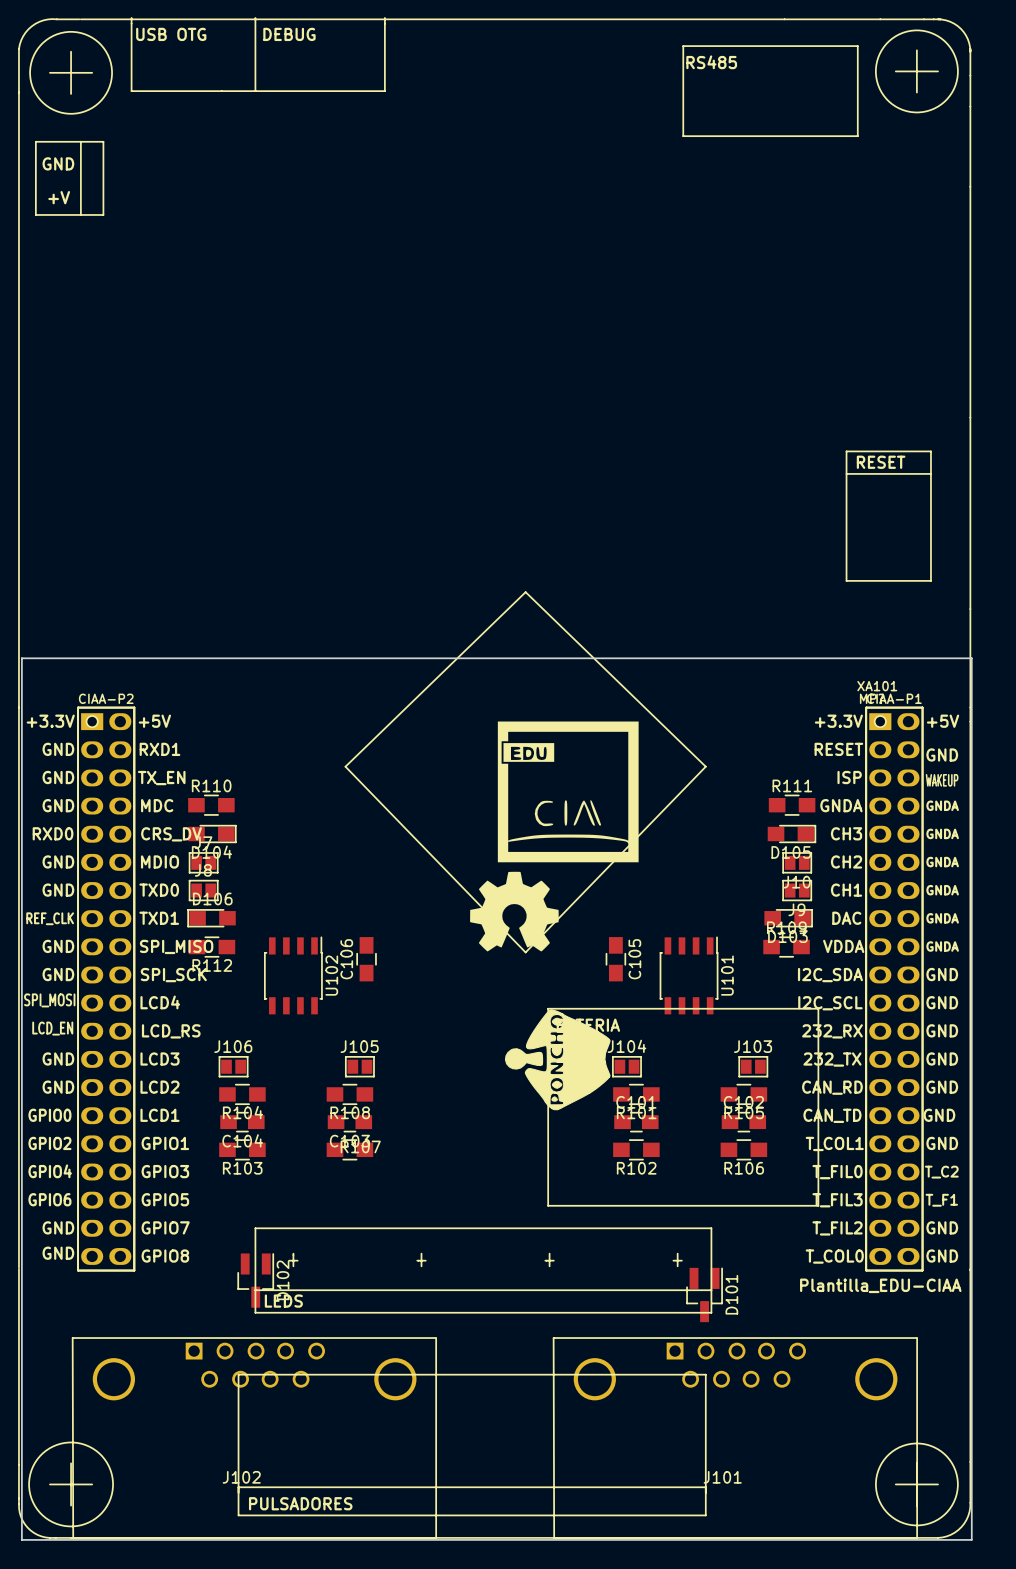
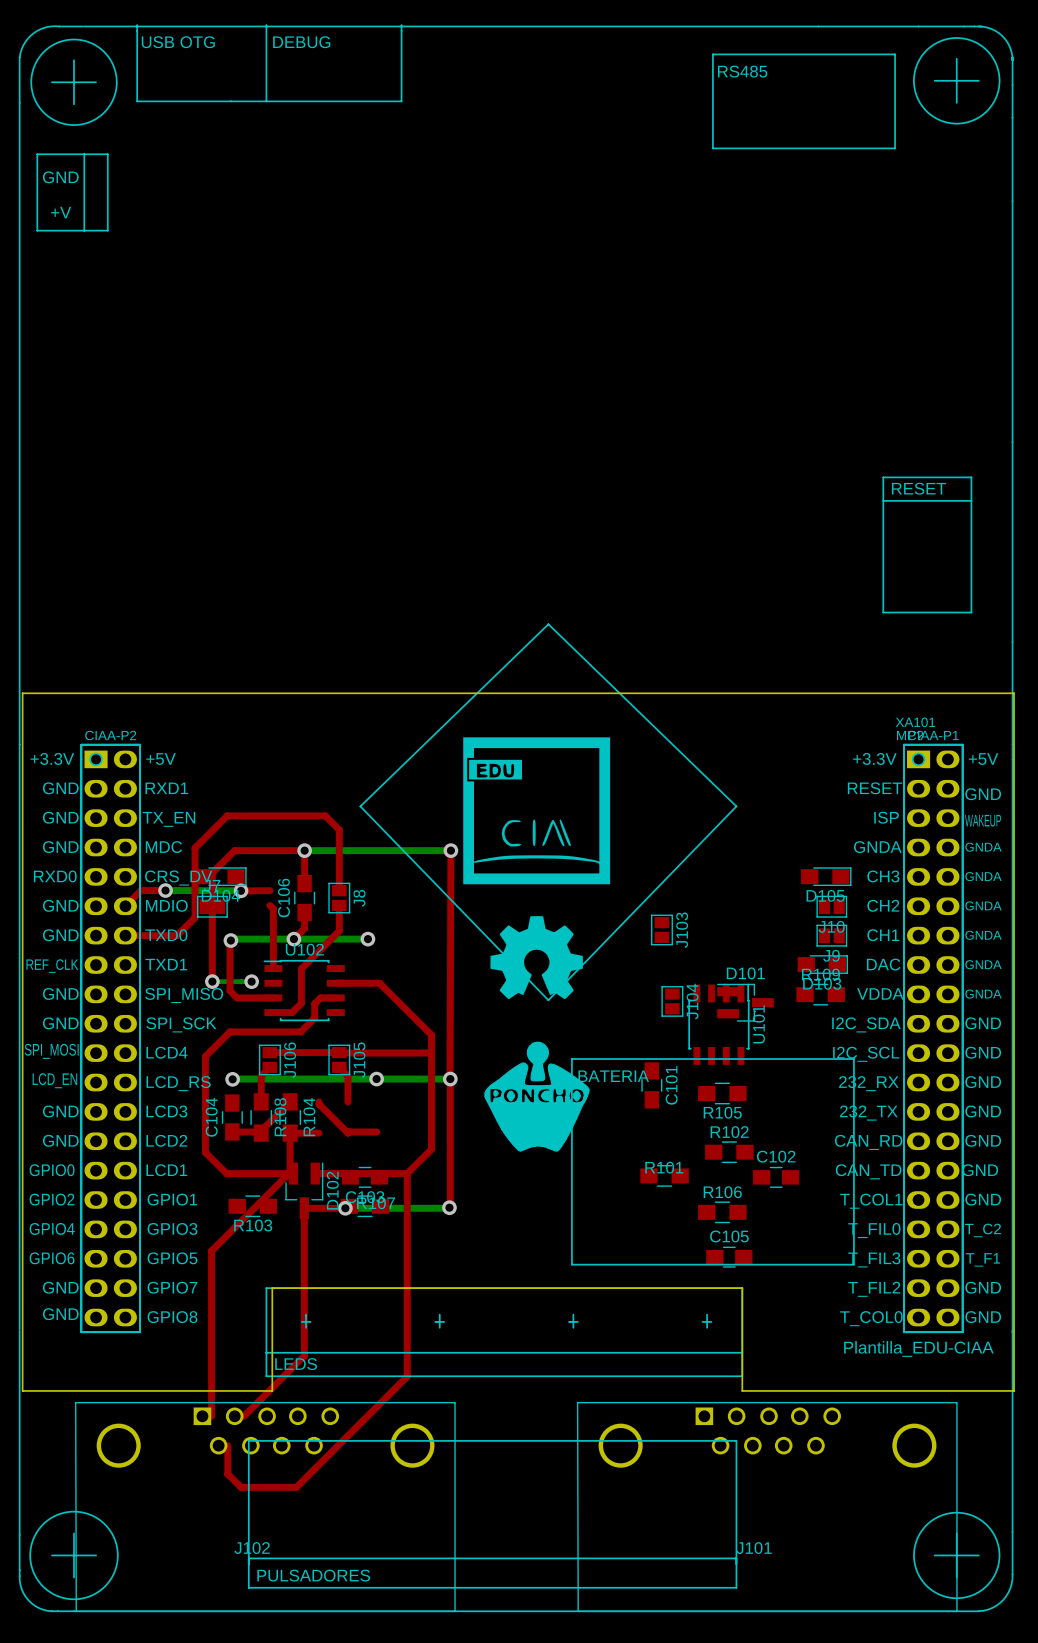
board edge: (21, 658) (21, 1539) (971, 1539) -> (22, 693) (22, 1390) (272, 1390) (272, 1288) (742, 1288) (742, 1390) (1014, 1390)
drawing position: (568, 791) -> (536, 810)
R110: (211, 805) -> none
R111: (792, 805) -> none
bottom track: none -> (304, 850) (450, 850)
via: none -> (304, 850)
top track: none -> (450, 850) (449, 1207)
via: none -> (450, 850)
top track: none -> (304, 883) (304, 850) (234, 850) (212, 872) (212, 981)
bottom track: none -> (165, 890) (241, 890)
top track: none -> (165, 890) (141, 890) (125, 906)
via: none -> (165, 890)
via: none -> (241, 890)
top track: none -> (269, 890) (241, 890)
top track: none -> (339, 890) (339, 829) (325, 815) (227, 815) (195, 848) (195, 917) (177, 935) (125, 935)
top track: none -> (269, 905) (273, 908) (273, 968)
top track: none -> (339, 905) (339, 931) (301, 968) (301, 1003) (292, 1012) (273, 1012)
top track: none -> (304, 912) (304, 928) (293, 939)
J8 rotation: 0° (203, 890) -> 90° clockwise (339, 898)
J8 position: (203, 890) -> (339, 898)
via: none -> (293, 939)
bottom track: none -> (367, 939) (230, 940)
via: none -> (367, 939)
top track: none -> (230, 940) (230, 990) (237, 997) (273, 997)
via: none -> (230, 940)
D106: (211, 918) -> none
via: none -> (212, 981)
via: none -> (251, 981)
top track: none -> (335, 983) (379, 983) (431, 1035) (431, 1149) (407, 1173)
R112: (211, 947) -> none
top track: none -> (335, 997) (320, 997) (314, 1003) (314, 1018) (300, 1031) (230, 1031) (205, 1056) (205, 1152) (226, 1173) (293, 1173) (290, 1170) (290, 1133) (319, 1133)
C106 position: (366, 959) -> (304, 898)
C105 rotation: 0° (615, 959) -> 90° clockwise (729, 1257)
C105 position: (615, 959) -> (729, 1257)
C105 name position: C105 (634, 959) -> C105 (729, 1236)
U102 rotation: 0° (293, 975) -> 90° counterclockwise (304, 990)
drawing: none -> [484, 1041, 590, 1152]
top track: none -> (269, 1052) (431, 1053)
drawing: [504, 1009, 611, 1111] -> none
top track: none -> (269, 1067) (261, 1076) (261, 1101)
top track: none -> (339, 1067) (347, 1076) (347, 1101)
via: none -> (376, 1079)
bottom track: none -> (450, 1079) (232, 1079)
via: none -> (450, 1079)
via: none -> (232, 1079)
top track: none -> (290, 1101) (261, 1130) (261, 1133) (232, 1131)
top track: none -> (319, 1101) (319, 1104) (347, 1133) (376, 1131)
J106 rotation: 0° (233, 1066) -> 90° clockwise (269, 1059)
J106 position: (233, 1066) -> (269, 1059)
J105 rotation: 0° (359, 1066) -> 90° clockwise (339, 1059)
J105 position: (359, 1066) -> (339, 1059)
J104 rotation: 0° (626, 1066) -> 90° clockwise (672, 1001)
J104 position: (626, 1066) -> (672, 1001)
J103 rotation: 0° (753, 1066) -> 90° clockwise (661, 929)
J103 position: (753, 1066) -> (661, 929)
R104 rotation: 0° (242, 1094) -> 90° clockwise (290, 1117)
R104 position: (242, 1094) -> (290, 1117)
R108 rotation: 0° (349, 1094) -> 90° clockwise (261, 1117)
R108 position: (349, 1094) -> (261, 1117)
R101 position: (636, 1094) -> (664, 1175)
R105 position: (743, 1094) -> (722, 1093)
R104 name position: R104 (242, 1112) -> R104 (309, 1117)
R108 name position: R108 (350, 1112) -> R108 (280, 1117)
top track: none -> (289, 1173) (211, 1251) (211, 1416)
top track: none -> (315, 1173) (407, 1173)
top track: none -> (407, 1173) (407, 1376) (296, 1487) (241, 1487) (227, 1474) (227, 1445)
C104 rotation: 0° (242, 1122) -> 90° clockwise (232, 1117)
C104 position: (242, 1122) -> (232, 1117)
C101 rotation: 0° (636, 1122) -> 90° clockwise (651, 1085)
C101 position: (636, 1122) -> (651, 1085)
R102 position: (636, 1149) -> (729, 1152)
R106 position: (743, 1149) -> (722, 1212)
top track: none -> (345, 1208) (304, 1208) (304, 1355) (243, 1416)
via: none -> (345, 1208)
bottom track: none -> (449, 1207) (345, 1208)
via: none -> (449, 1207)
R102 name position: R102 (636, 1168) -> R102 (729, 1132)
R106 name position: R106 (744, 1168) -> R106 (722, 1192)
D102 position: (255, 1280) -> (304, 1190)
D101 rotation: 0° (704, 1294) -> 90° counterclockwise (745, 1002)
D101 position: (704, 1294) -> (745, 1002)
board edge: (971, 1326) (971, 1539) -> none

